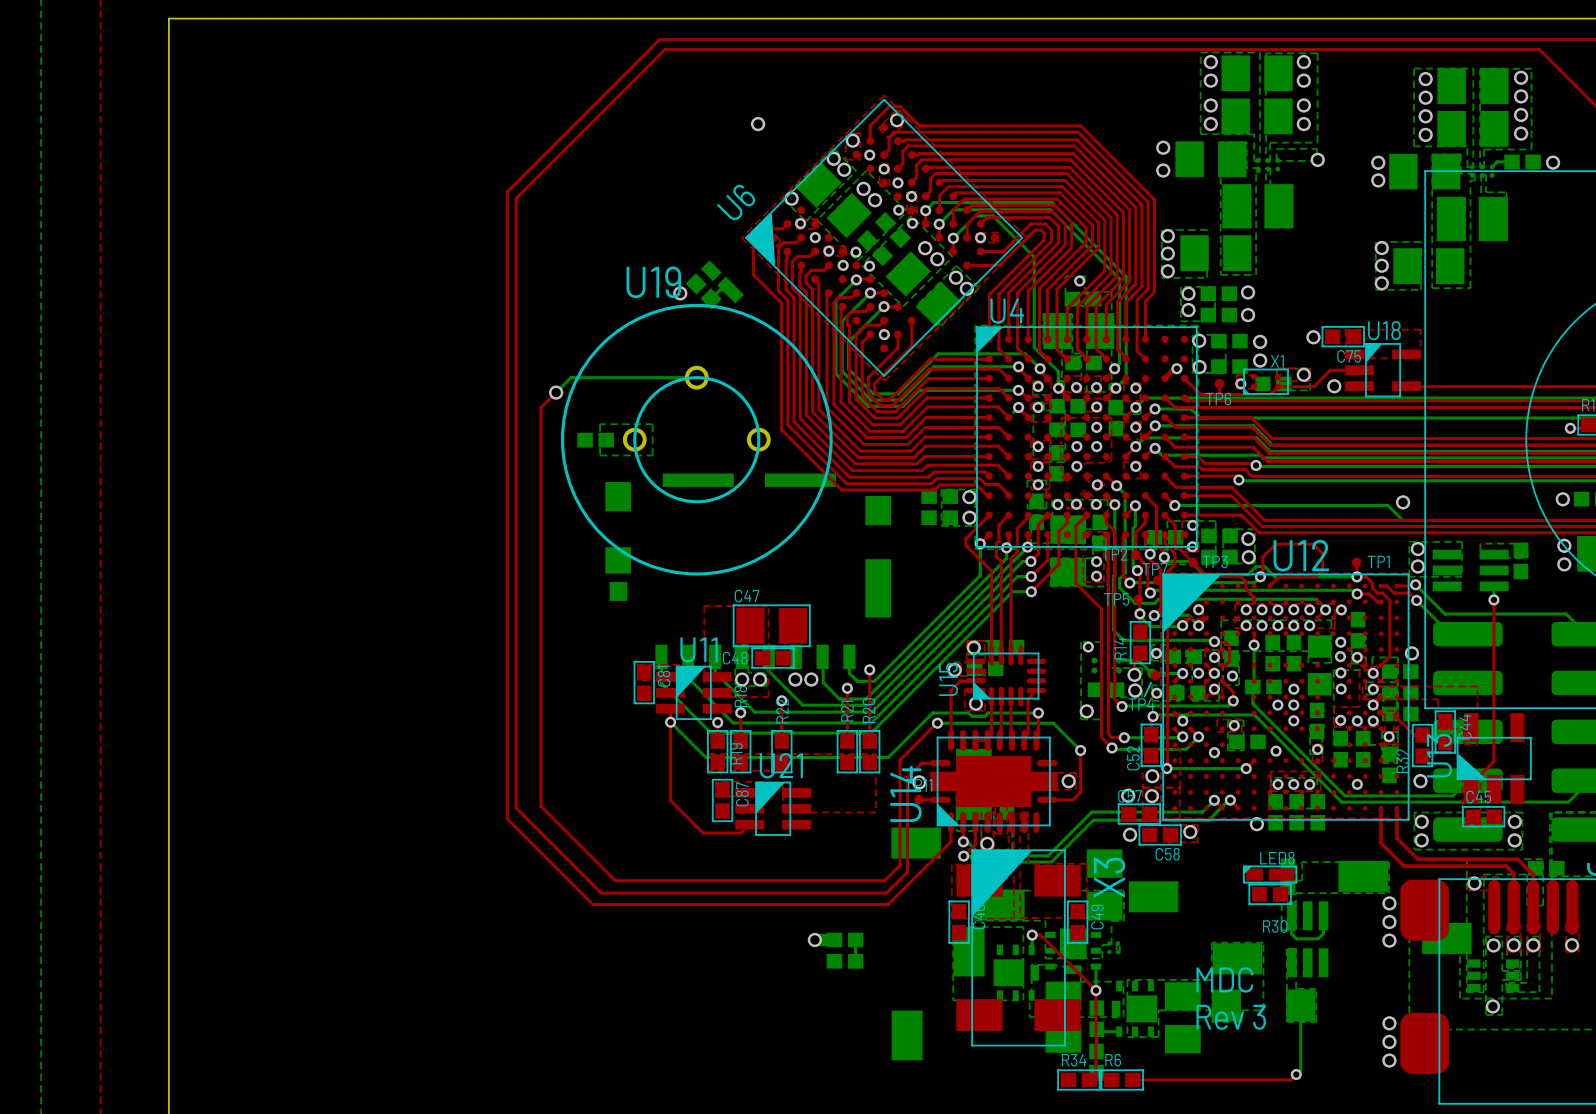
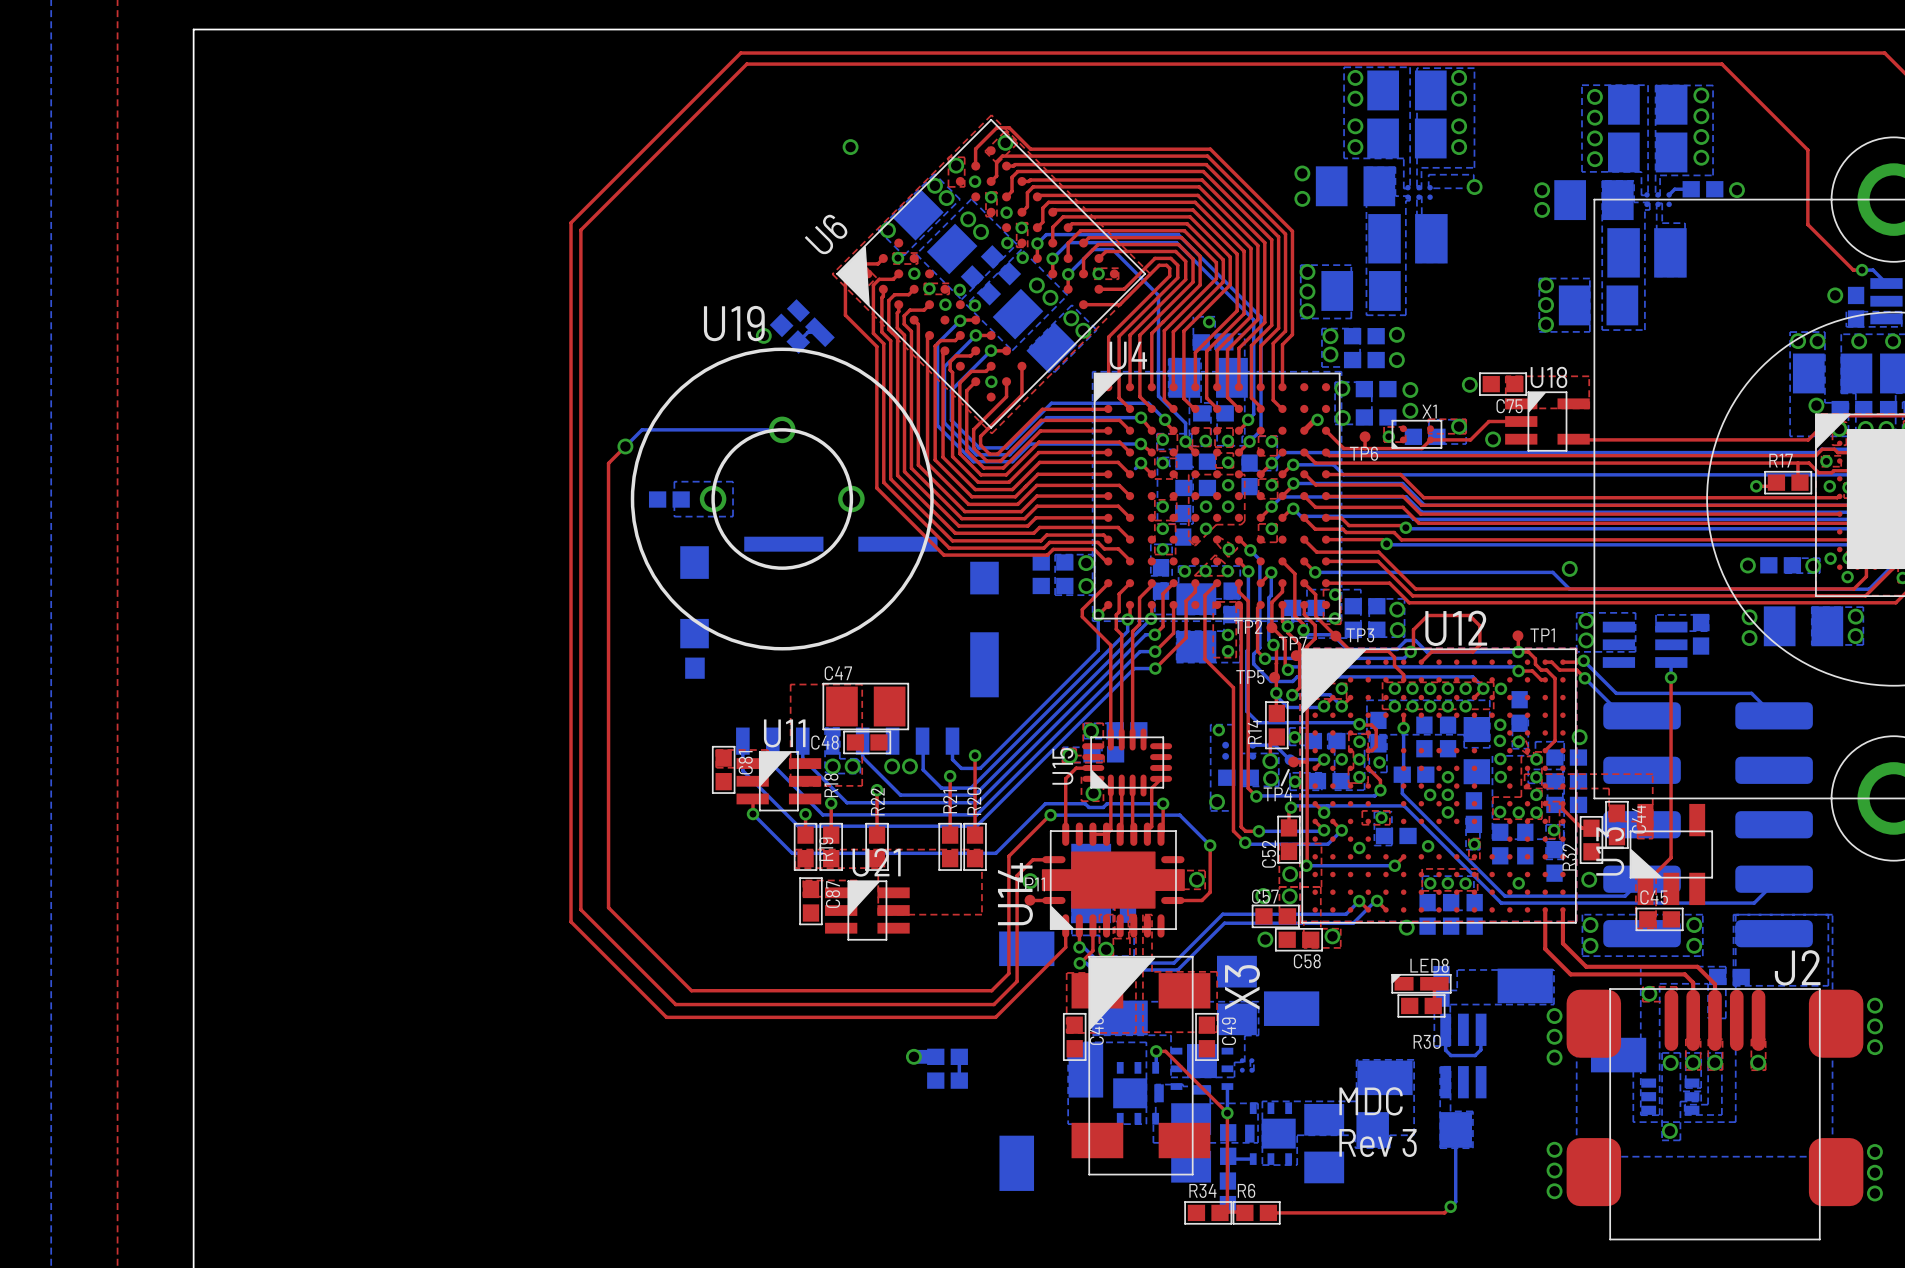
top track: (670, 722) (670, 800) (703, 833) (741, 833) (749, 824) -> none

